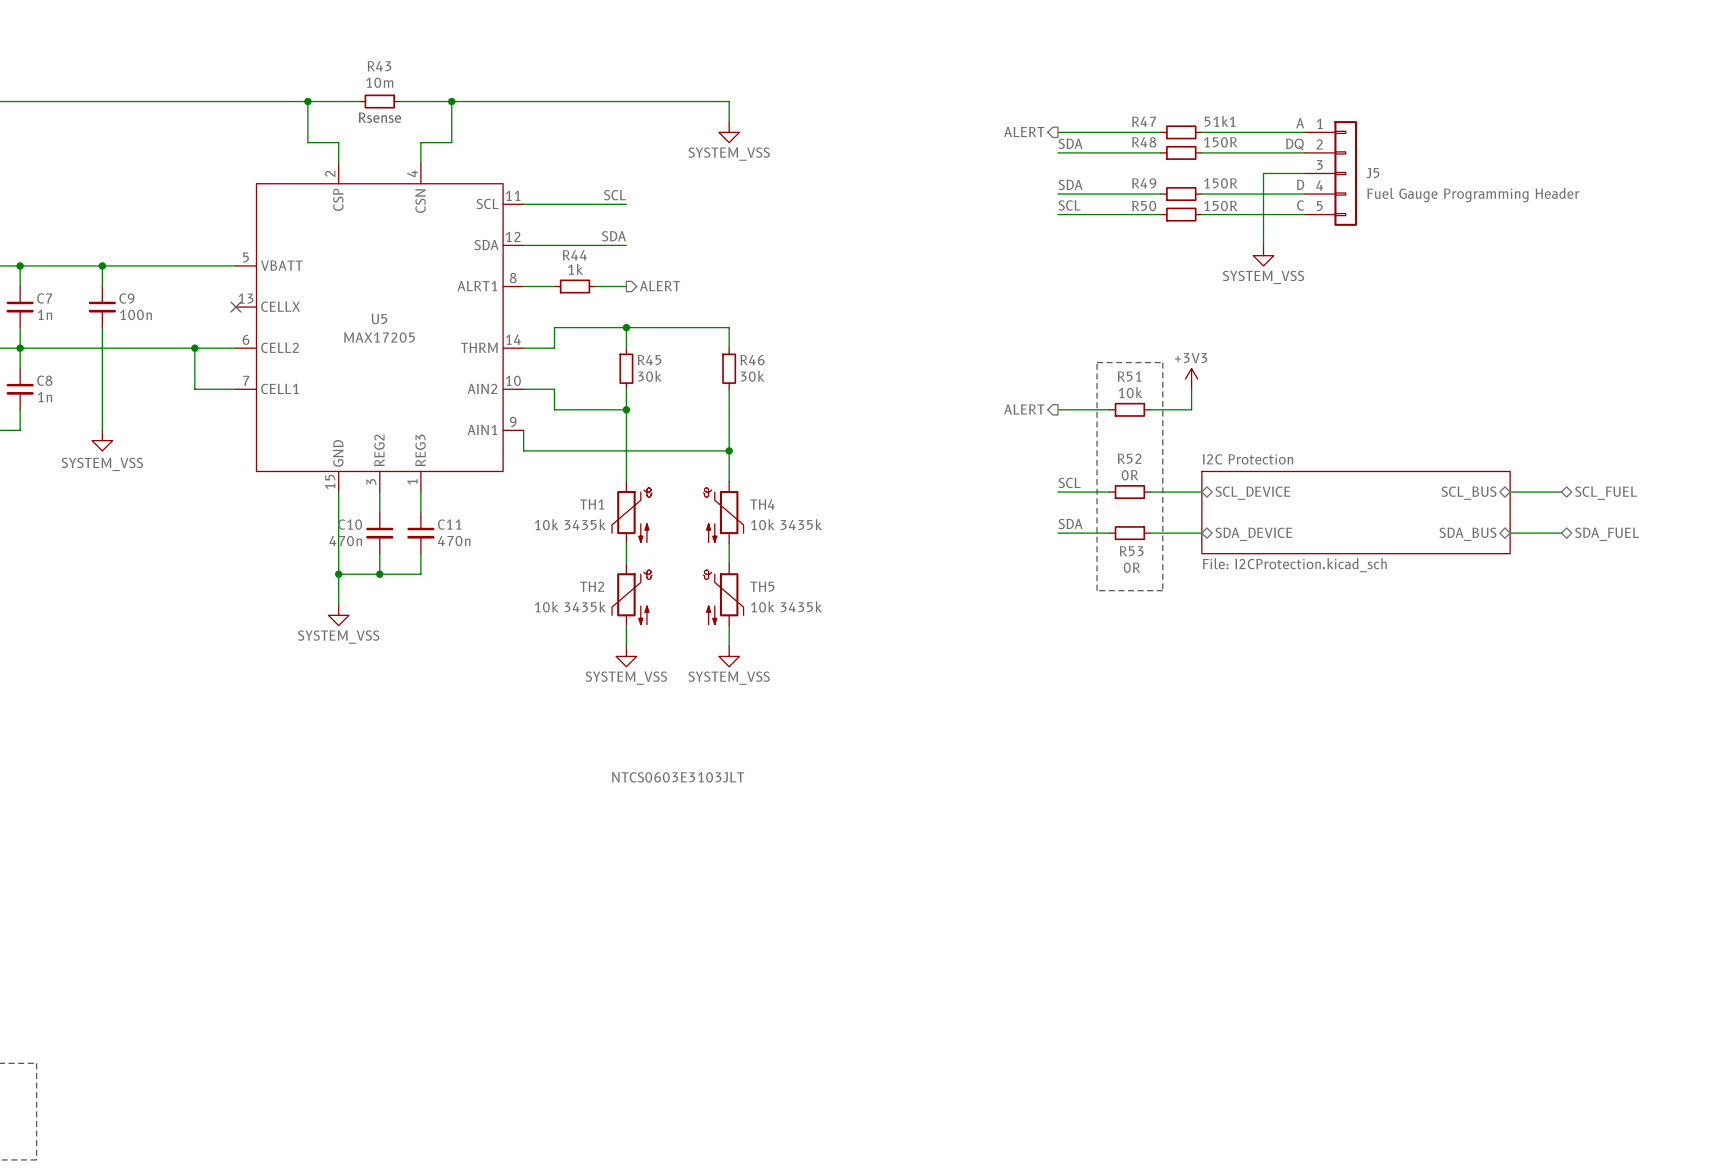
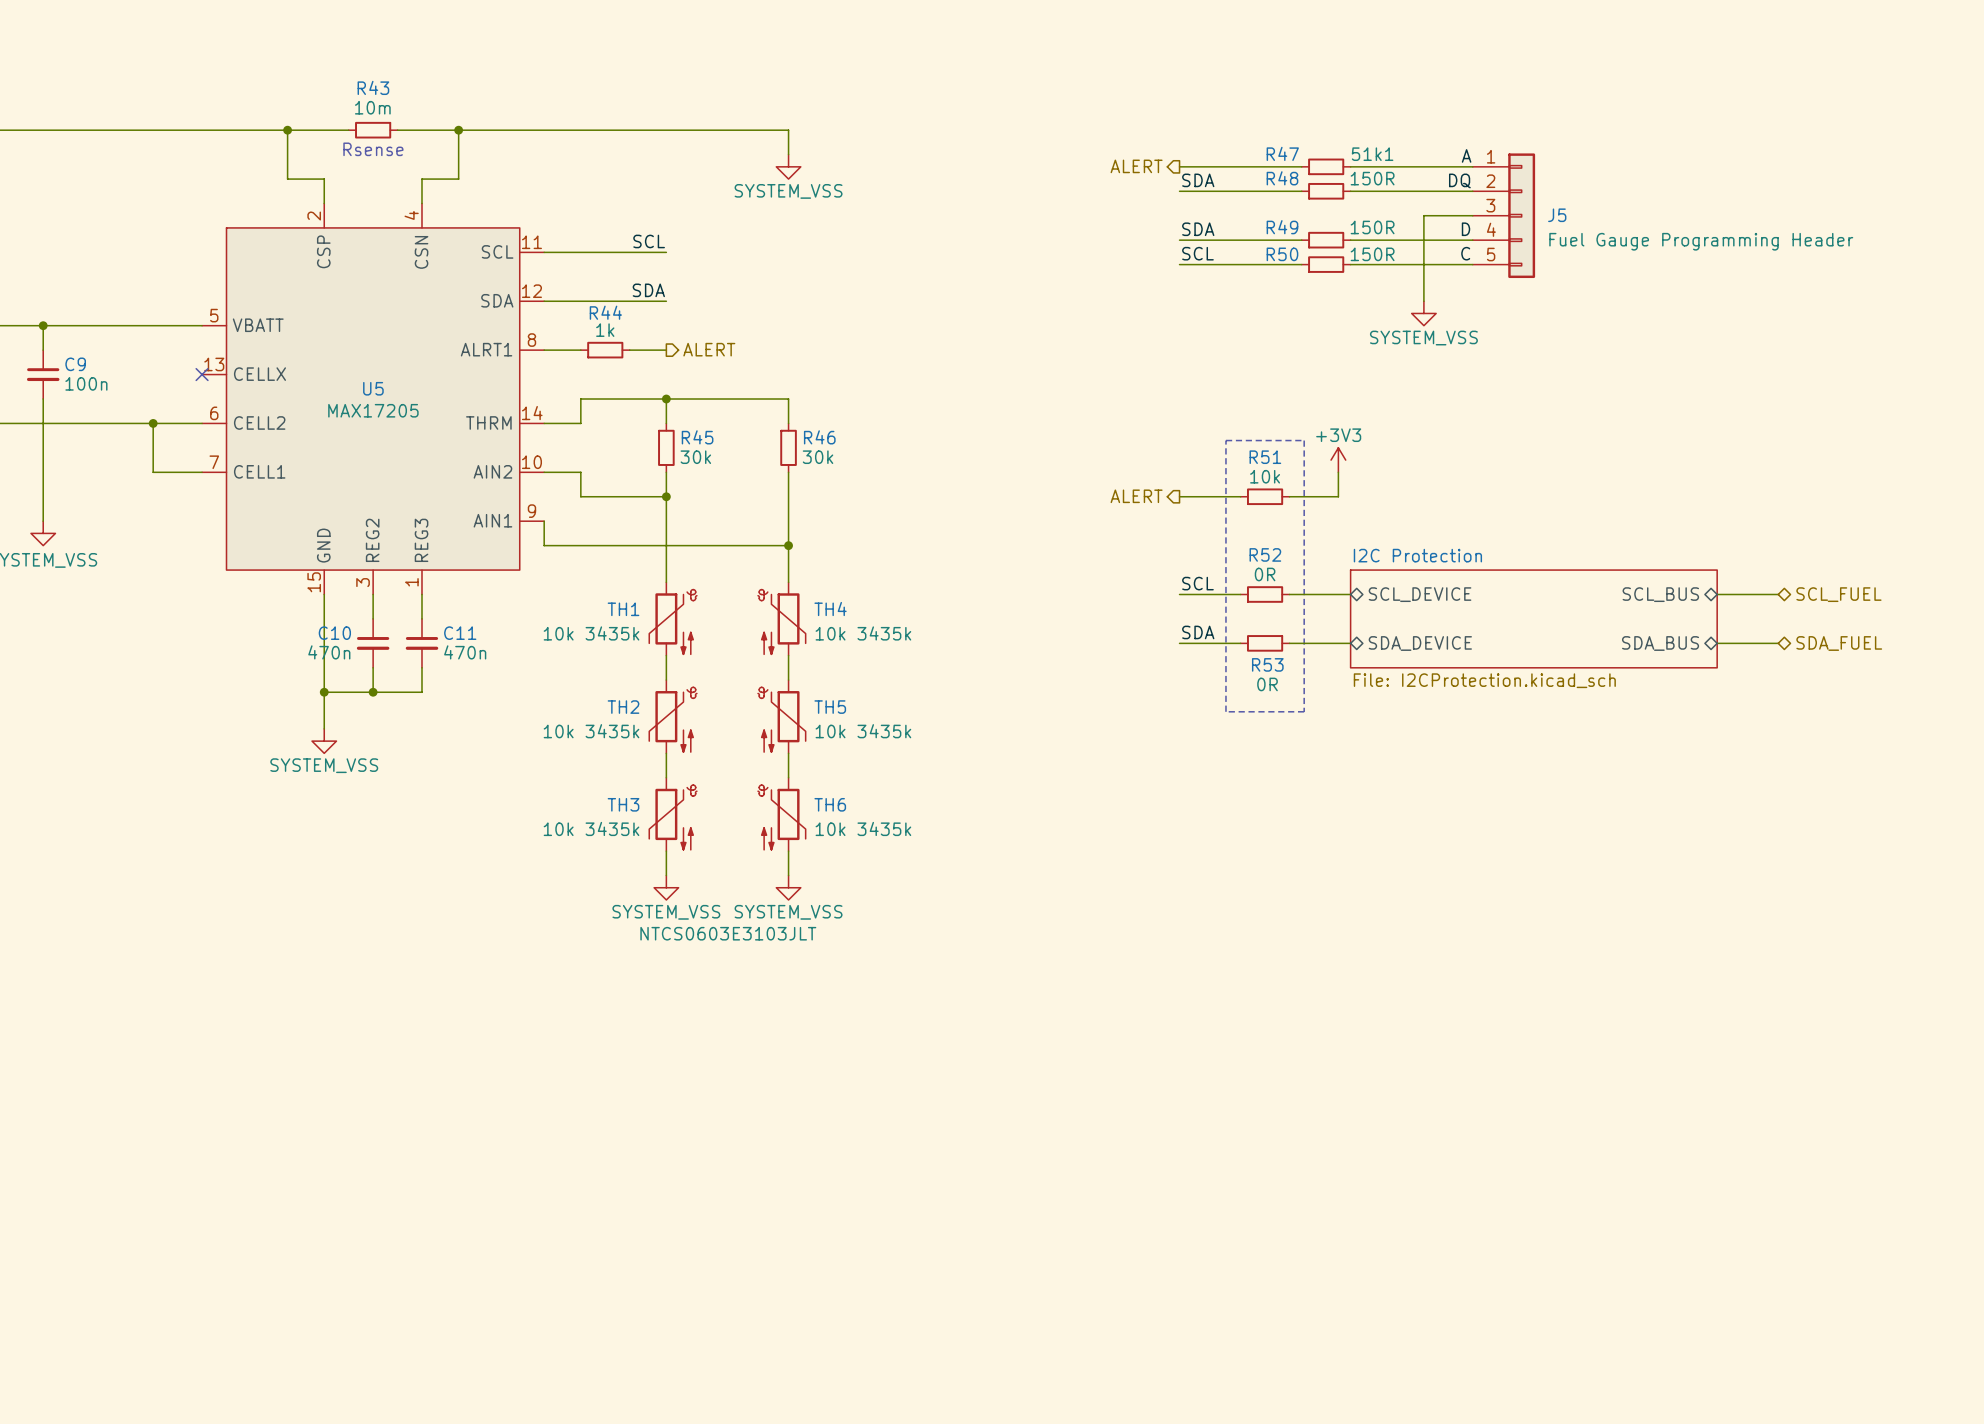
power symbol: SYSTEM_VSS (626, 656) -> none
power symbol: SYSTEM_VSS (729, 656) -> none
TH3: none -> 10k 3435k (673, 814)
TH6: none -> 10k 3435k (781, 814)
wire: none -> (666, 851) (666, 875)
wire: none -> (788, 851) (788, 875)
power symbol: none -> SYSTEM_VSS (666, 887)
power symbol: none -> SYSTEM_VSS (788, 887)

